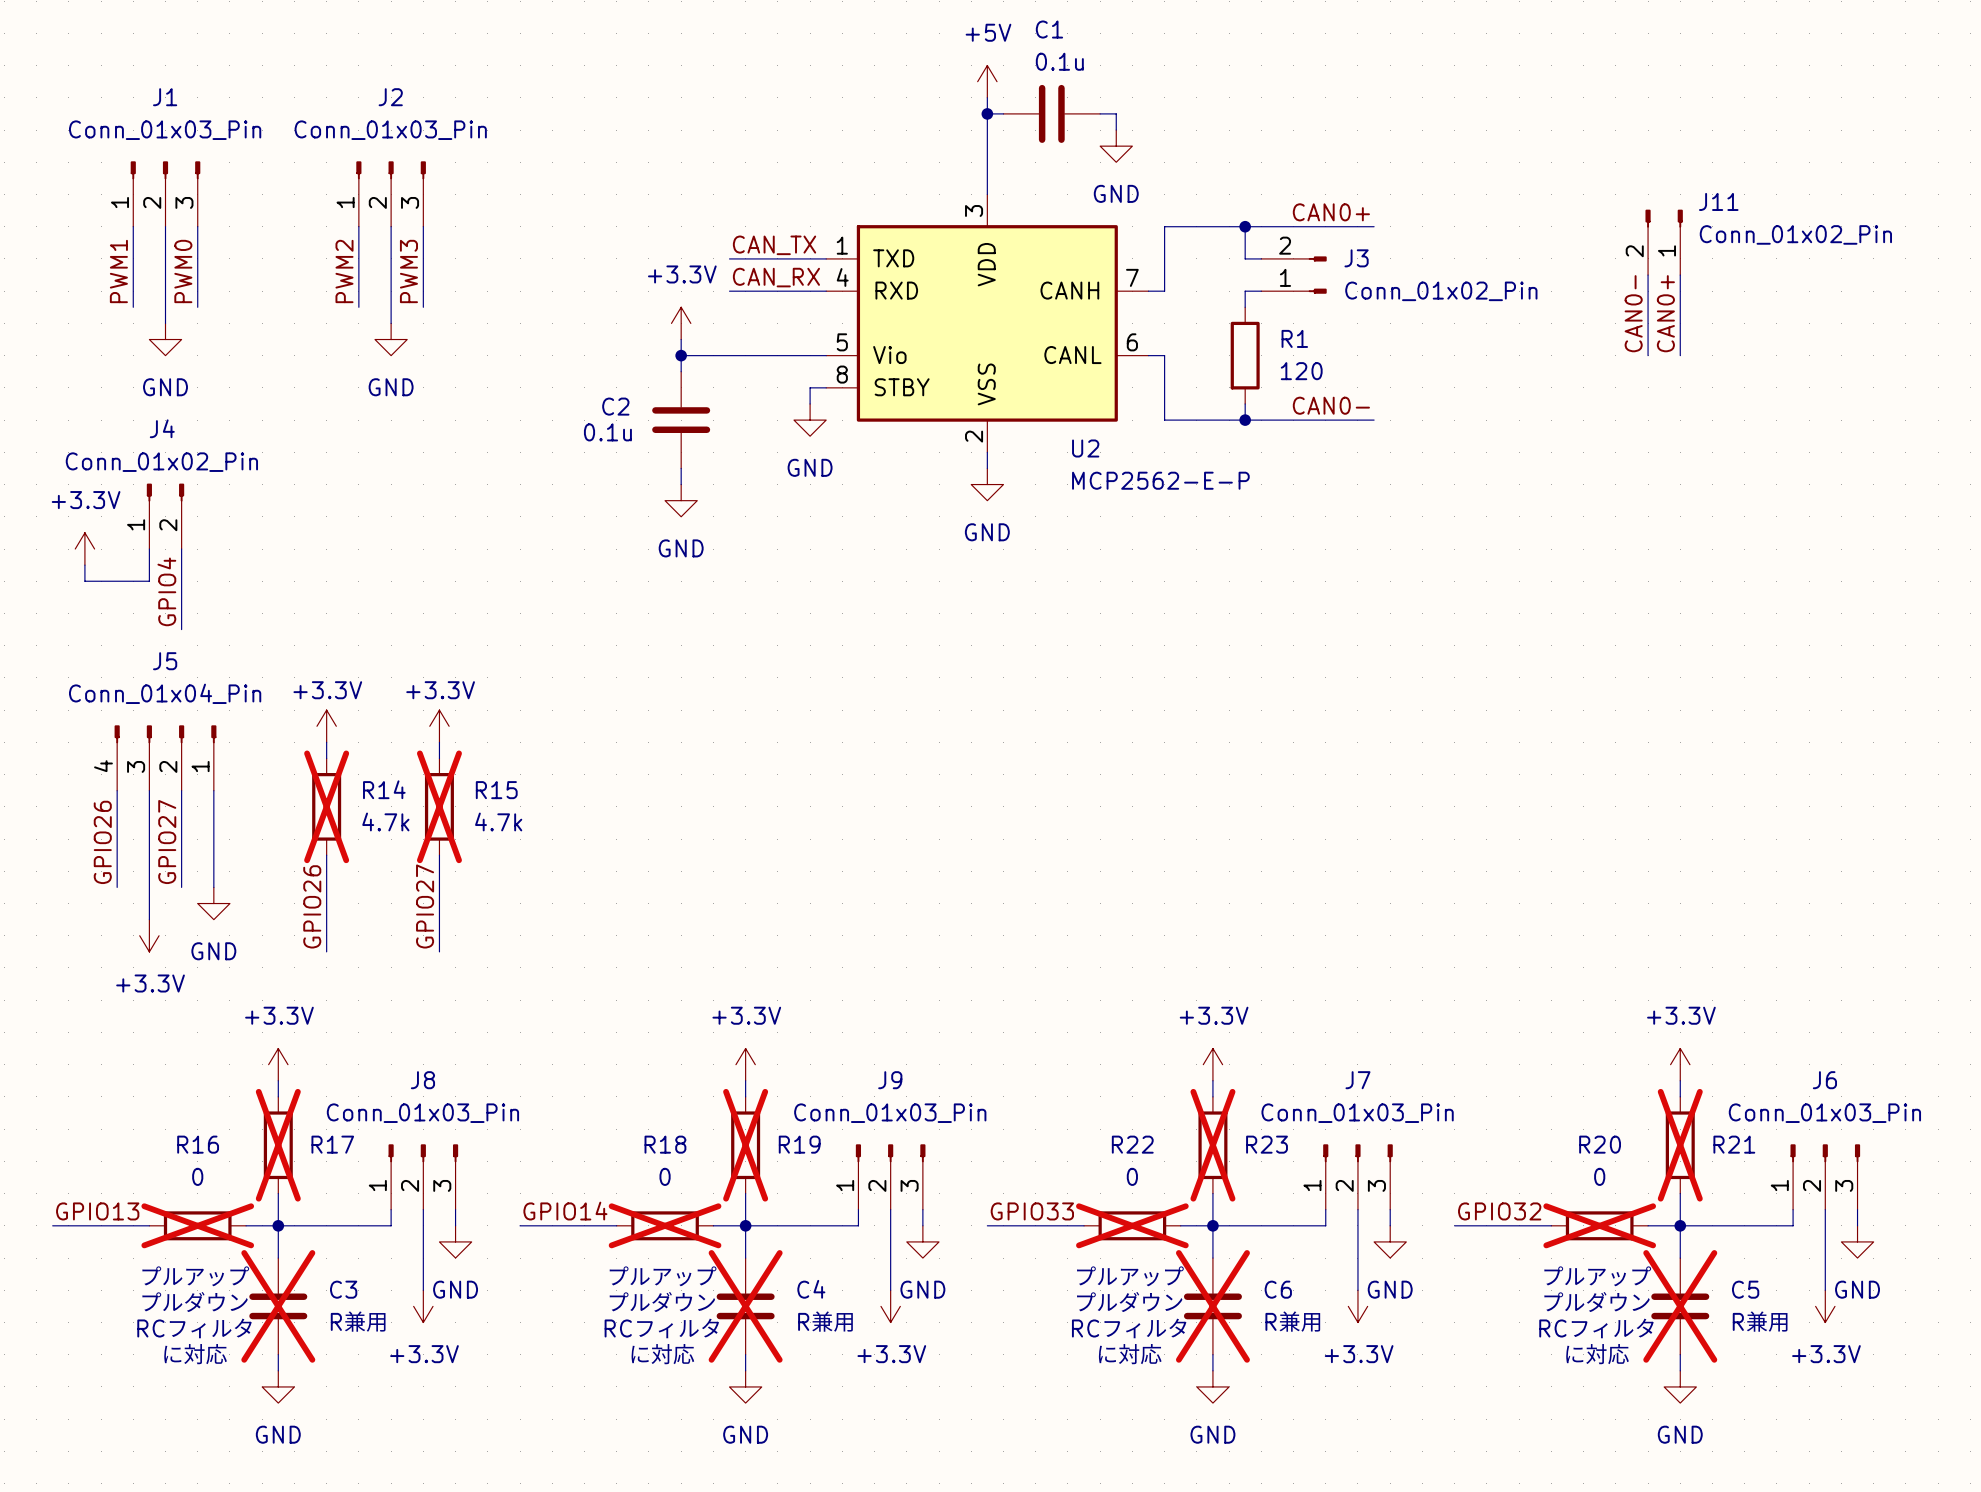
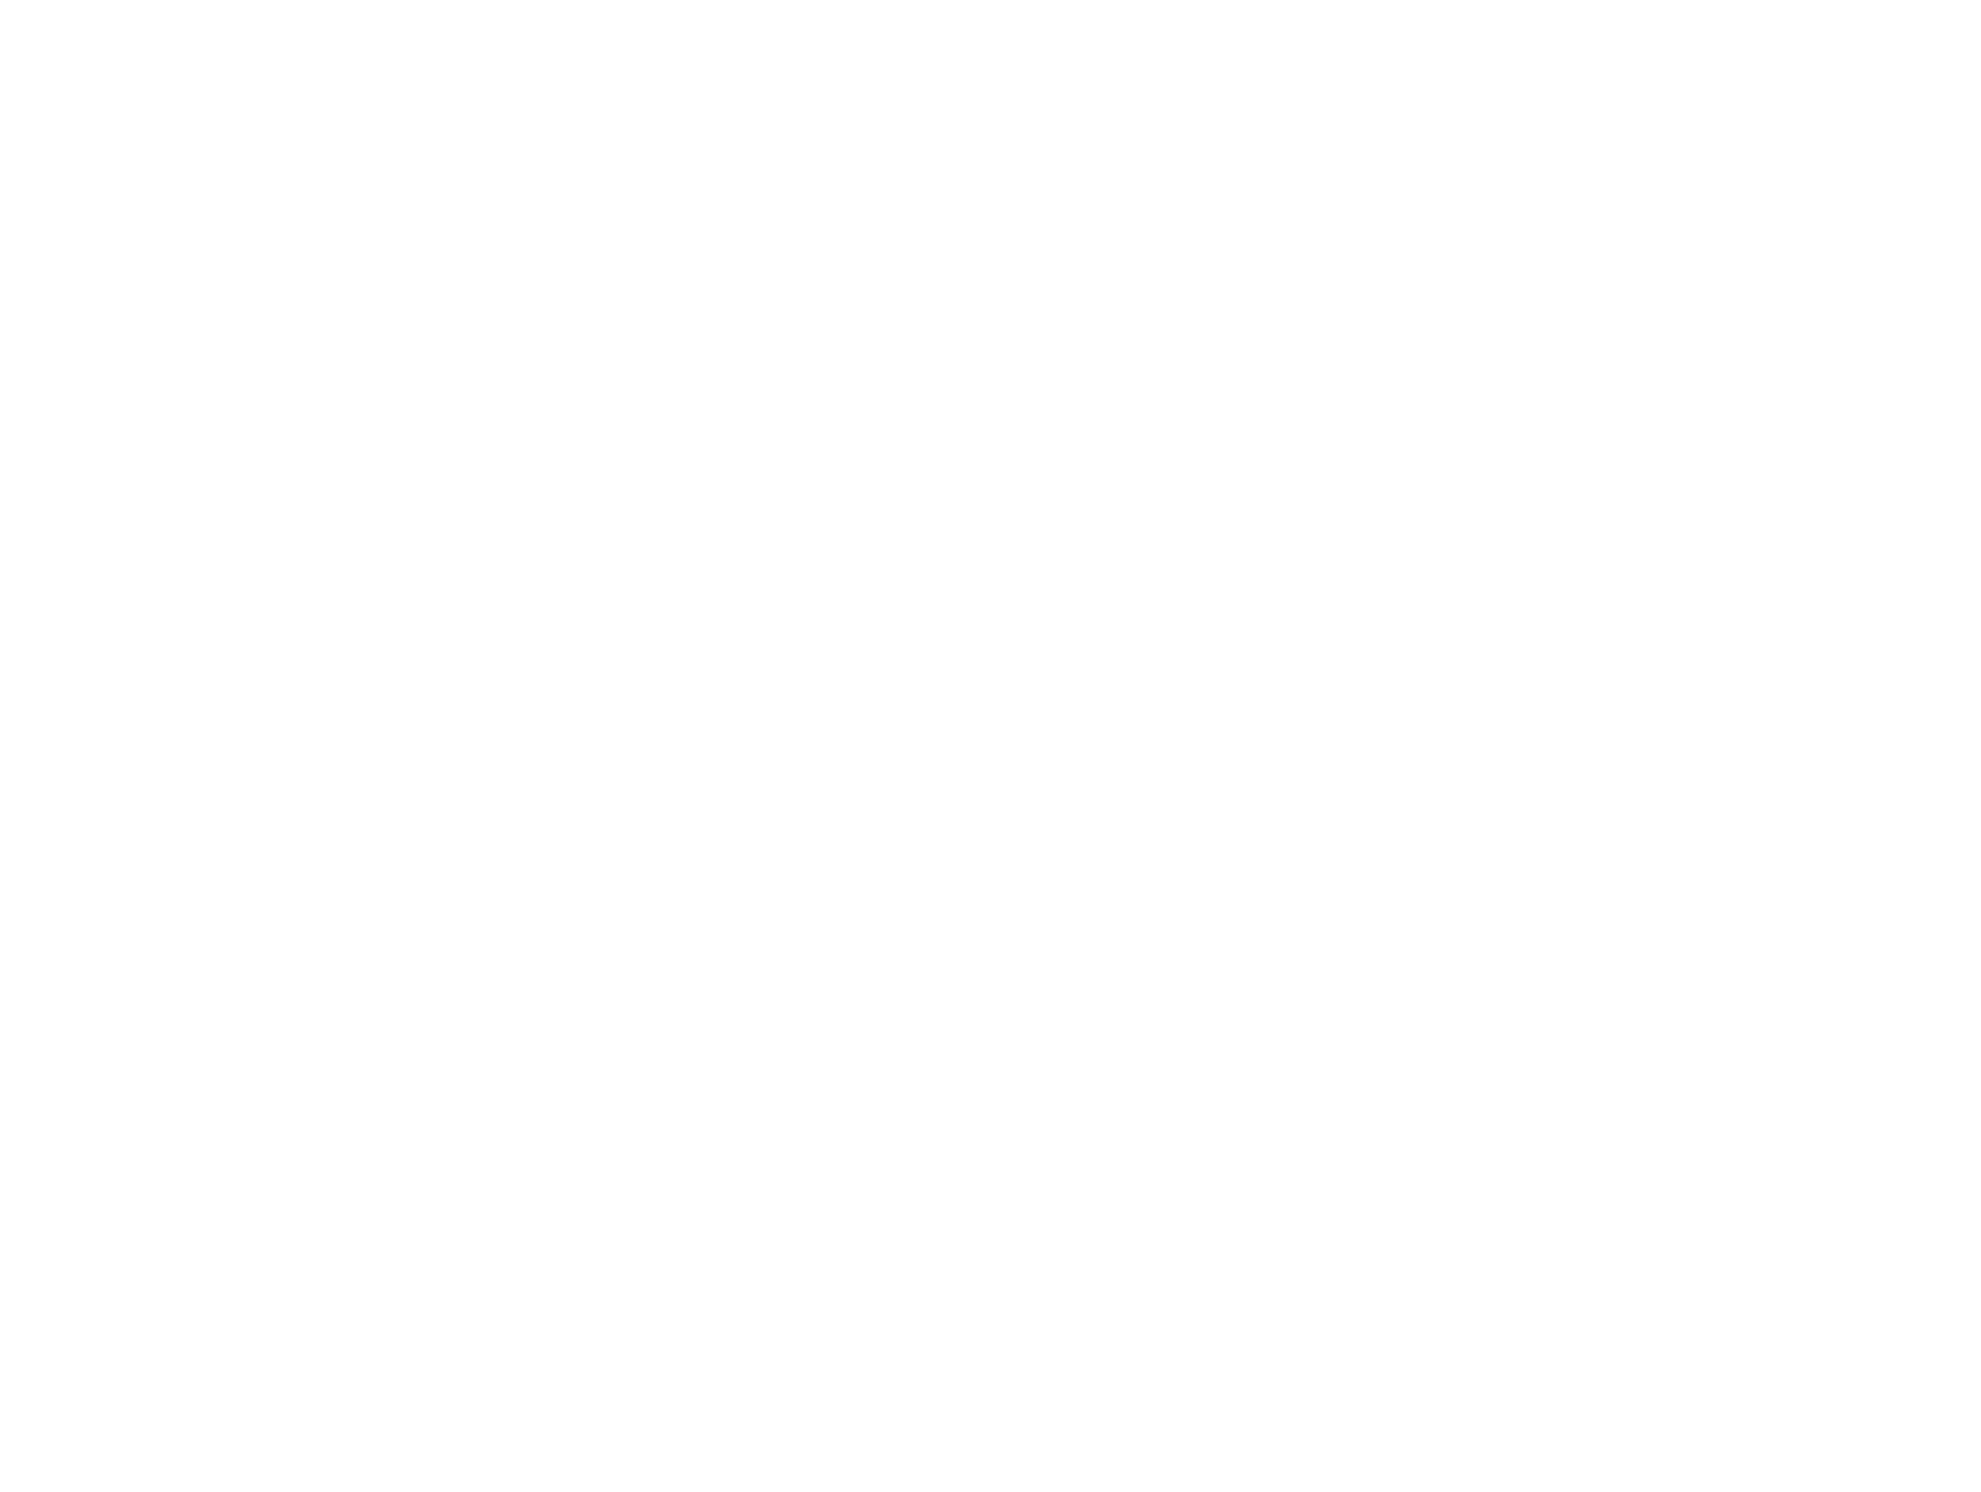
power symbol: +5V (987, 81) -> none
wire: (987, 97) (987, 194) -> none
wire: (987, 113) (1003, 113) -> none
junction: (987, 113) -> none
C1: 0.1u (1051, 113) -> none
wire: (1100, 113) (1116, 113) (1116, 130) -> none
power symbol: GND (1116, 146) -> none
J1: Conn_01x03_Pin (165, 194) -> none
J2: Conn_01x03_Pin (391, 194) -> none
label: CAN0+ (1331, 212) -> none
wire: (133, 226) (133, 307) -> none
wire: (165, 226) (165, 323) -> none
wire: (197, 226) (197, 307) -> none
wire: (358, 226) (358, 307) -> none
wire: (391, 226) (391, 323) -> none
wire: (423, 226) (423, 307) -> none
wire: (1245, 226) (1245, 258) (1261, 258) -> none
junction: (1245, 226) -> none
wire: (1374, 226) (1164, 226) (1164, 291) (1148, 291) -> none
J11: Conn_01x02_Pin (1664, 242) -> none
label: CAN_TX (774, 245) -> none
wire: (729, 258) (826, 258) -> none
label: PWM1 (118, 271) -> none
label: PWM0 (183, 271) -> none
label: PWM2 (344, 271) -> none
label: PWM3 (408, 271) -> none
J3: Conn_01x02_Pin (1294, 275) -> none
wire: (1648, 275) (1648, 355) -> none
wire: (1680, 275) (1680, 355) -> none
label: CAN_RX (776, 277) -> none
wire: (729, 291) (826, 291) -> none
wire: (1261, 291) (1245, 291) (1245, 307) -> none
label: CAN0- (1633, 313) -> none
label: CAN0+ (1665, 313) -> none
power symbol: +3.3V (681, 323) -> none
U2: MCP2562-E-P (987, 323) -> none
power symbol: GND (165, 339) -> none
power symbol: GND (391, 339) -> none
wire: (681, 339) (681, 371) -> none
wire: (681, 355) (826, 355) -> none
junction: (681, 355) -> none
wire: (1148, 355) (1164, 355) (1164, 420) (1374, 420) -> none
R1: 120 (1245, 355) -> none
wire: (826, 387) (810, 387) (810, 403) -> none
wire: (1245, 403) (1245, 420) -> none
label: CAN0- (1331, 405) -> none
C2: 0.1u (681, 420) -> none
power symbol: GND (810, 420) -> none
junction: (1245, 420) -> none
wire: (987, 452) (987, 468) -> none
wire: (681, 468) (681, 484) -> none
power symbol: GND (987, 484) -> none
power symbol: GND (681, 500) -> none
J4: Conn_01x02_Pin (165, 516) -> none
power symbol: +3.3V (84, 549) -> none
wire: (149, 549) (149, 581) (84, 581) (84, 565) -> none
wire: (181, 549) (181, 629) -> none
label: GPIO4 (166, 591) -> none
power symbol: +3.3V (326, 726) -> none
power symbol: +3.3V (439, 726) -> none
wire: (326, 742) (326, 758) -> none
wire: (439, 742) (439, 758) -> none
J5: Conn_01x04_Pin (165, 758) -> none
wire: (117, 790) (117, 887) -> none
wire: (149, 790) (149, 919) -> none
wire: (181, 790) (181, 887) -> none
wire: (213, 790) (213, 887) -> none
R14: 4.7k (326, 806) -> none
R15: 4.7k (439, 806) -> none
label: GPIO26 (102, 842) -> none
label: GPIO27 (167, 842) -> none
wire: (326, 855) (326, 951) -> none
wire: (439, 855) (439, 951) -> none
power symbol: GND (213, 903) -> none
label: GPIO26 (312, 906) -> none
label: GPIO27 (425, 906) -> none
power symbol: +3.3V (149, 935) -> none
power symbol: +3.3V (278, 1064) -> none
power symbol: +3.3V (745, 1064) -> none
power symbol: +3.3V (1212, 1064) -> none
power symbol: +3.3V (1680, 1064) -> none
wire: (278, 1080) (278, 1096) -> none
wire: (745, 1080) (745, 1096) -> none
wire: (1212, 1080) (1212, 1096) -> none
wire: (1680, 1080) (1680, 1096) -> none
R17: (278, 1145) -> none
R19: (745, 1145) -> none
R23: (1212, 1145) -> none
R21: (1680, 1145) -> none
J8: Conn_01x03_Pin (423, 1176) -> none
J9: Conn_01x03_Pin (890, 1176) -> none
J7: Conn_01x03_Pin (1357, 1176) -> none
J6: Conn_01x03_Pin (1825, 1176) -> none
wire: (278, 1193) (278, 1258) -> none
wire: (745, 1193) (745, 1258) -> none
wire: (1212, 1193) (1212, 1258) -> none
wire: (1680, 1193) (1680, 1258) -> none
wire: (391, 1209) (391, 1225) (246, 1225) -> none
wire: (423, 1209) (423, 1290) -> none
wire: (455, 1209) (455, 1225) -> none
wire: (858, 1209) (858, 1225) (713, 1225) -> none
wire: (890, 1209) (890, 1290) -> none
wire: (922, 1209) (922, 1225) -> none
wire: (1325, 1209) (1325, 1225) (1180, 1225) -> none
wire: (1357, 1209) (1357, 1290) -> none
wire: (1390, 1209) (1390, 1225) -> none
wire: (1793, 1209) (1793, 1225) (1648, 1225) -> none
wire: (1825, 1209) (1825, 1290) -> none
wire: (1857, 1209) (1857, 1225) -> none
label: GPIO13 (97, 1211) -> none
label: GPIO14 (565, 1211) -> none
label: GPIO33 (1032, 1211) -> none
label: GPIO32 (1499, 1211) -> none
wire: (52, 1225) (149, 1225) -> none
R16: 0 (197, 1225) -> none
junction: (278, 1225) -> none
wire: (520, 1225) (616, 1225) -> none
R18: 0 (665, 1225) -> none
junction: (745, 1225) -> none
wire: (987, 1225) (1084, 1225) -> none
R22: 0 (1132, 1225) -> none
junction: (1212, 1225) -> none
wire: (1454, 1225) (1551, 1225) -> none
R20: 0 (1599, 1225) -> none
junction: (1680, 1225) -> none
power symbol: GND (455, 1241) -> none
power symbol: GND (922, 1241) -> none
power symbol: GND (1390, 1241) -> none
power symbol: GND (1857, 1241) -> none
text: プルアップ (195, 1276) -> none
text: プルアップ (663, 1276) -> none
text: プルアップ (1130, 1276) -> none
text: プルアップ (1597, 1276) -> none
text: プルダウン (195, 1302) -> none
text: プルダウン (662, 1302) -> none
text: プルダウン (1129, 1302) -> none
text: プルダウン (1597, 1302) -> none
C3: R兼用 (278, 1306) -> none
power symbol: +3.3V (423, 1306) -> none
C4: R兼用 (745, 1306) -> none
power symbol: +3.3V (890, 1306) -> none
C6: R兼用 (1212, 1306) -> none
power symbol: +3.3V (1357, 1306) -> none
C5: R兼用 (1680, 1306) -> none
power symbol: +3.3V (1825, 1306) -> none
text: RCフィルタ (195, 1328) -> none
text: RCフィルタ (662, 1328) -> none
text: RCフィルタ (1129, 1328) -> none
text: RCフィルタ (1597, 1328) -> none
text: に対応 (195, 1354) -> none
wire: (278, 1354) (278, 1370) -> none
text: に対応 (662, 1354) -> none
wire: (745, 1354) (745, 1370) -> none
text: に対応 (1130, 1354) -> none
wire: (1212, 1354) (1212, 1370) -> none
text: に対応 (1597, 1354) -> none
wire: (1680, 1354) (1680, 1370) -> none
power symbol: GND (278, 1386) -> none
power symbol: GND (745, 1386) -> none
power symbol: GND (1212, 1386) -> none
power symbol: GND (1680, 1386) -> none

